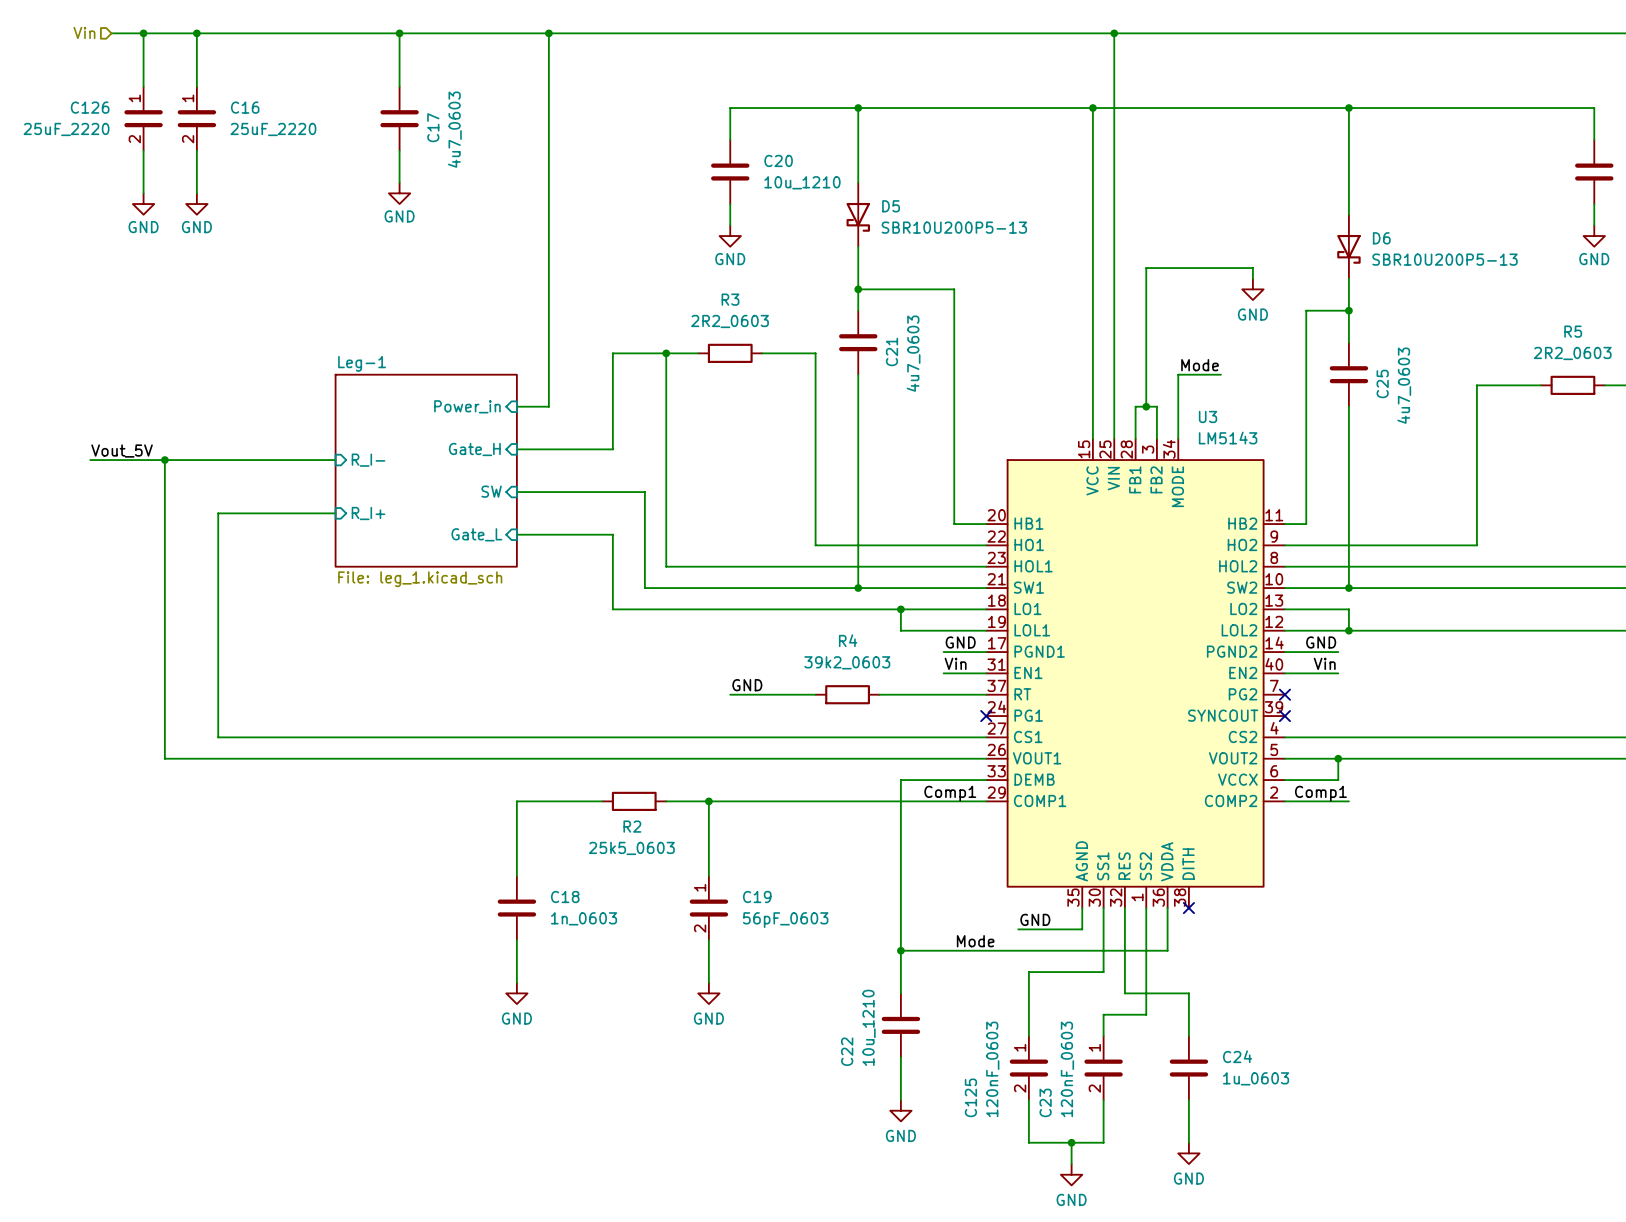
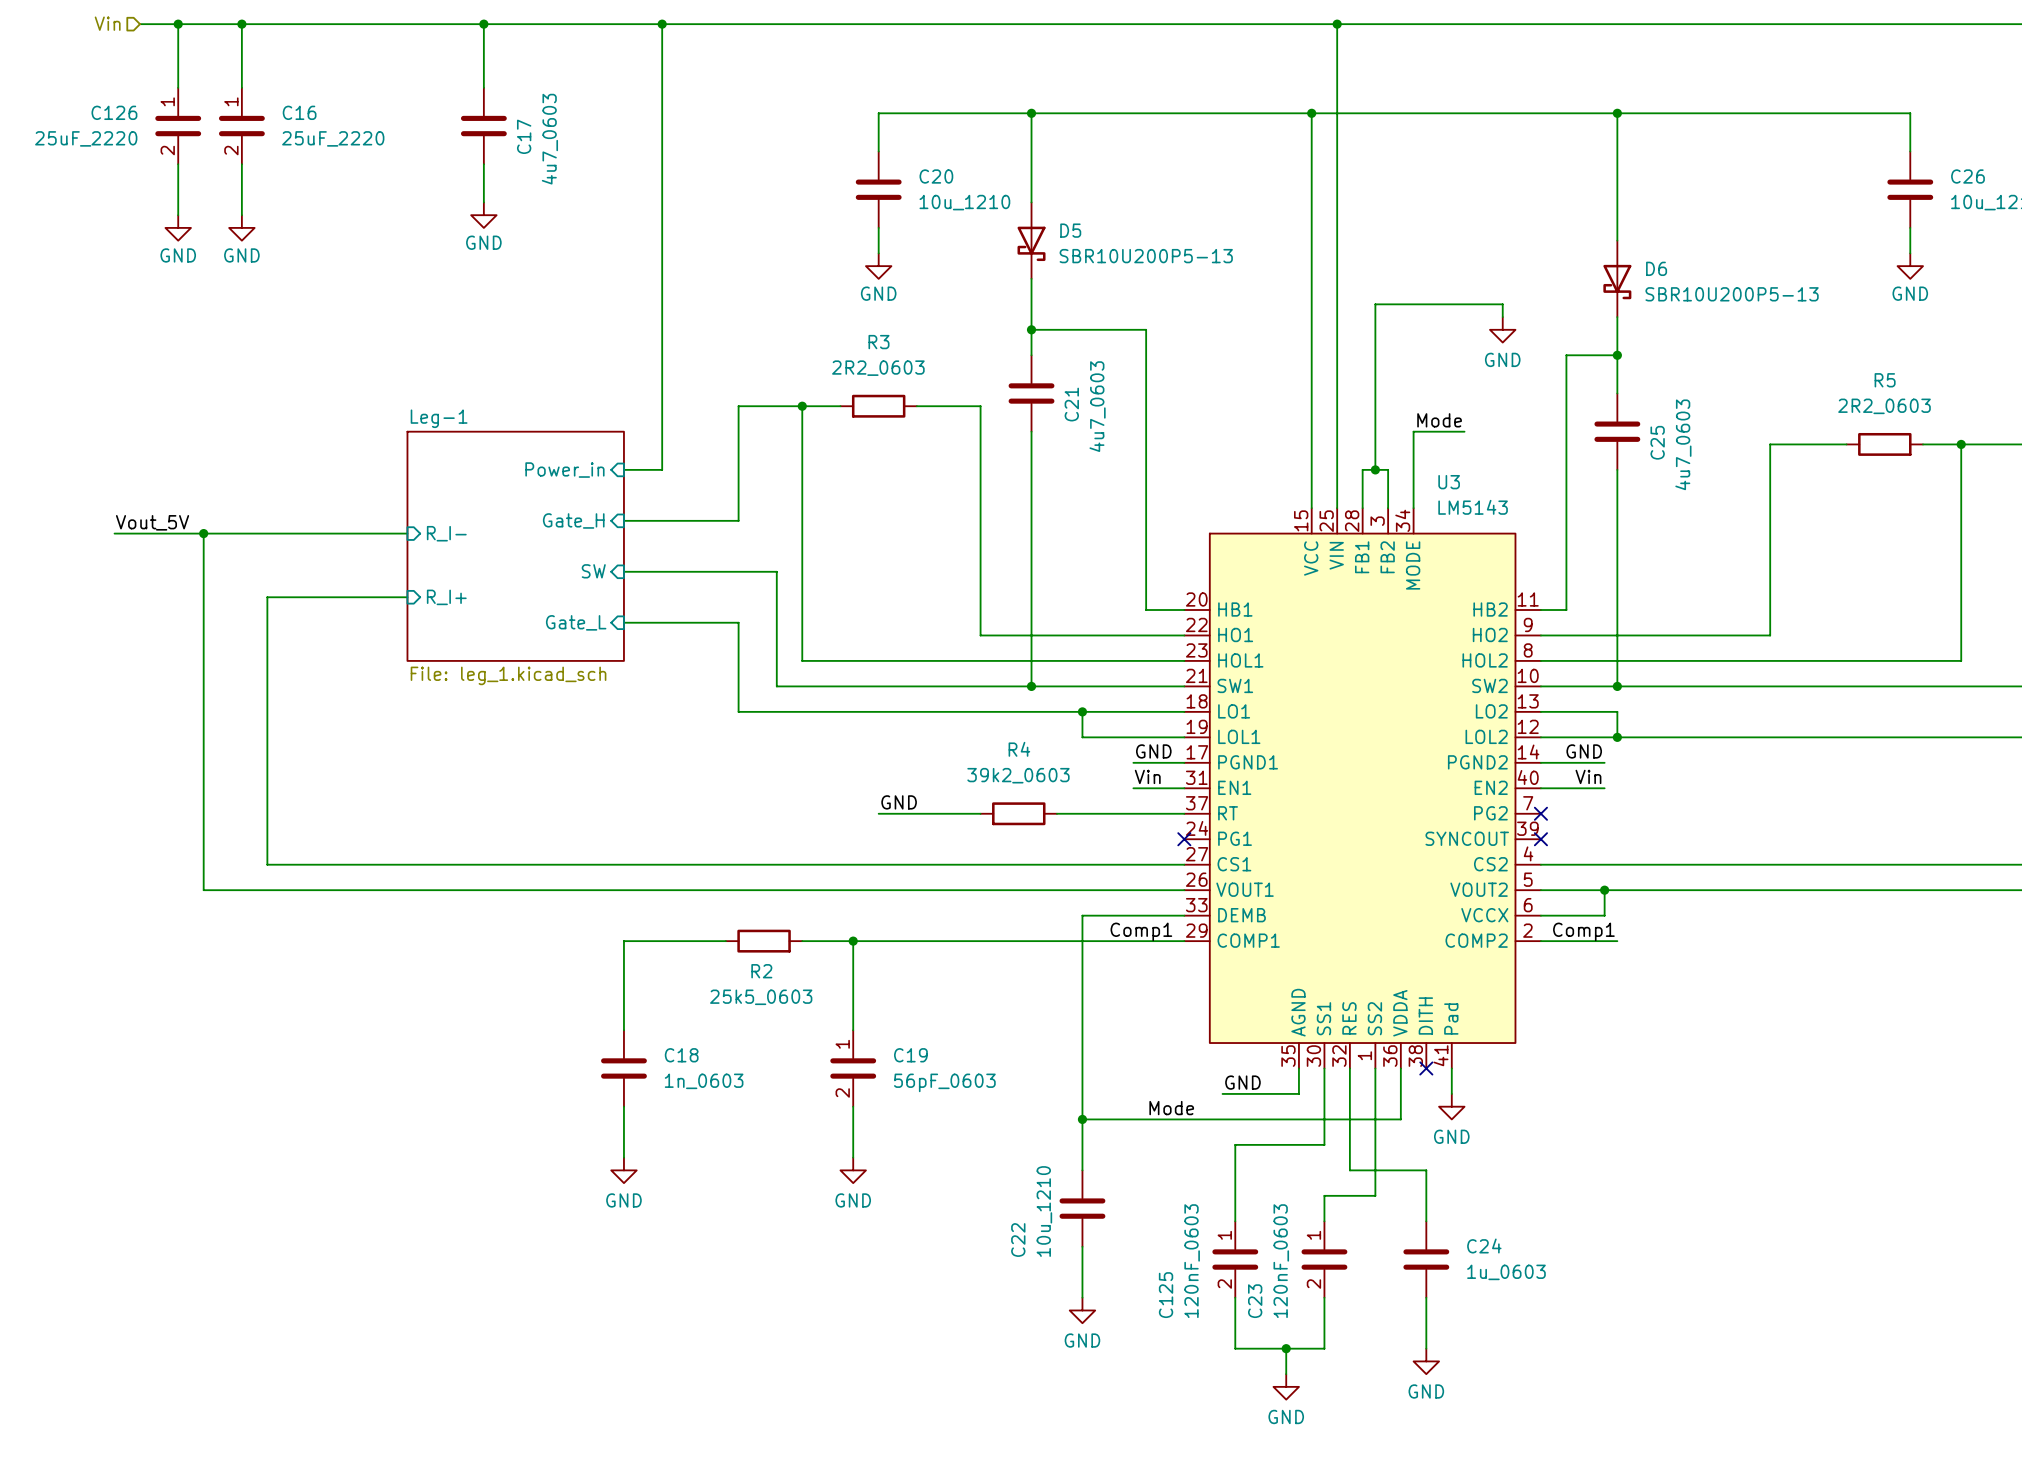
U3 symbol: [986, 438, 1285, 909] -> [1184, 508, 1541, 1069]
wire: none -> (1451, 1068) (1451, 1093)
power symbol: none -> GND (1451, 1106)

